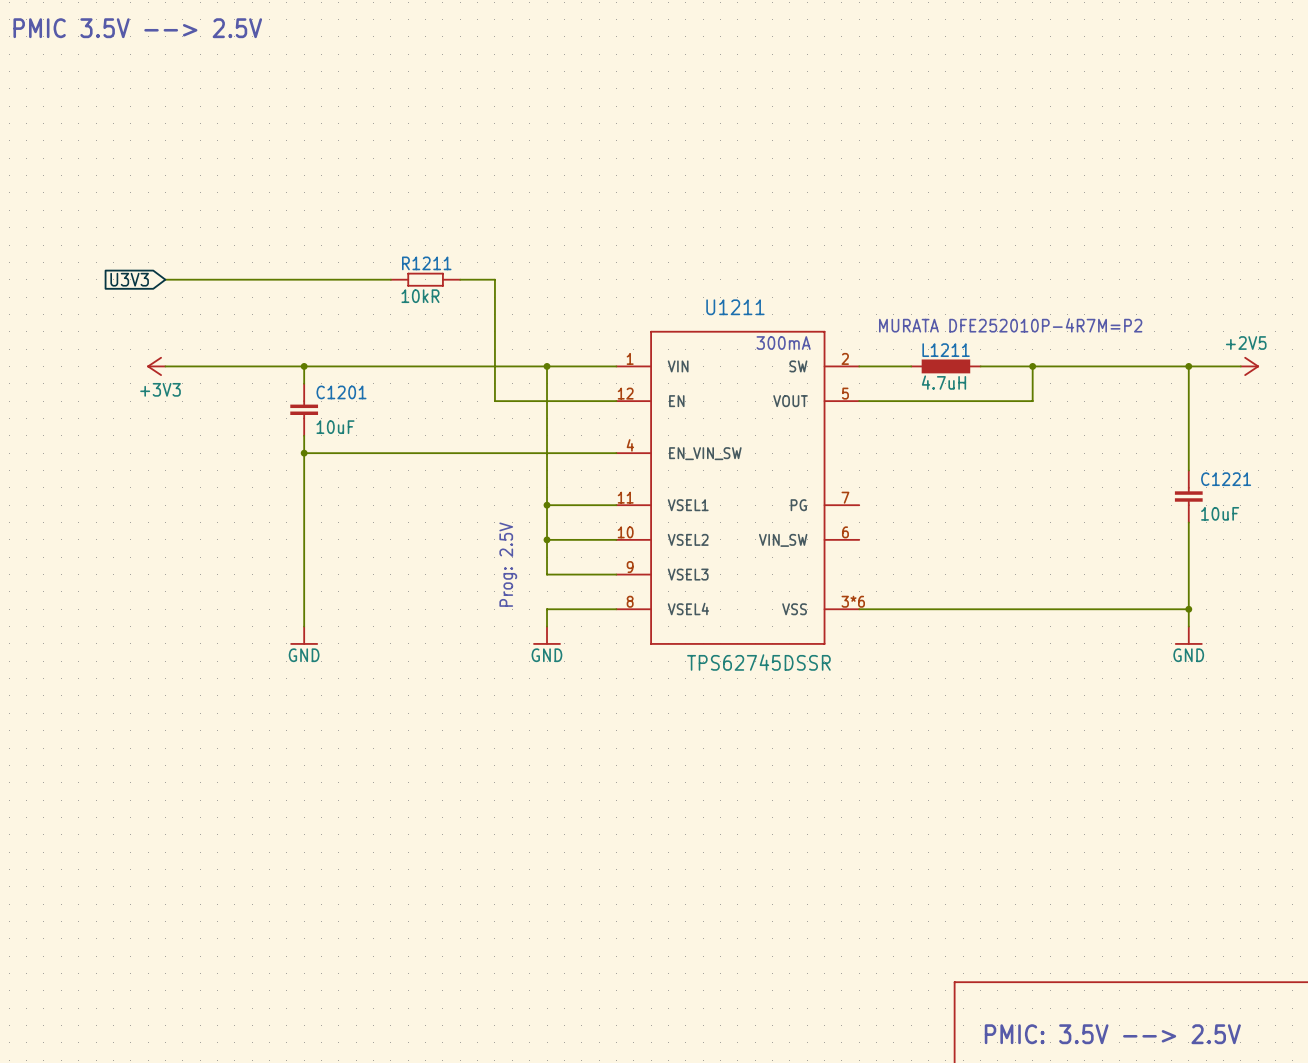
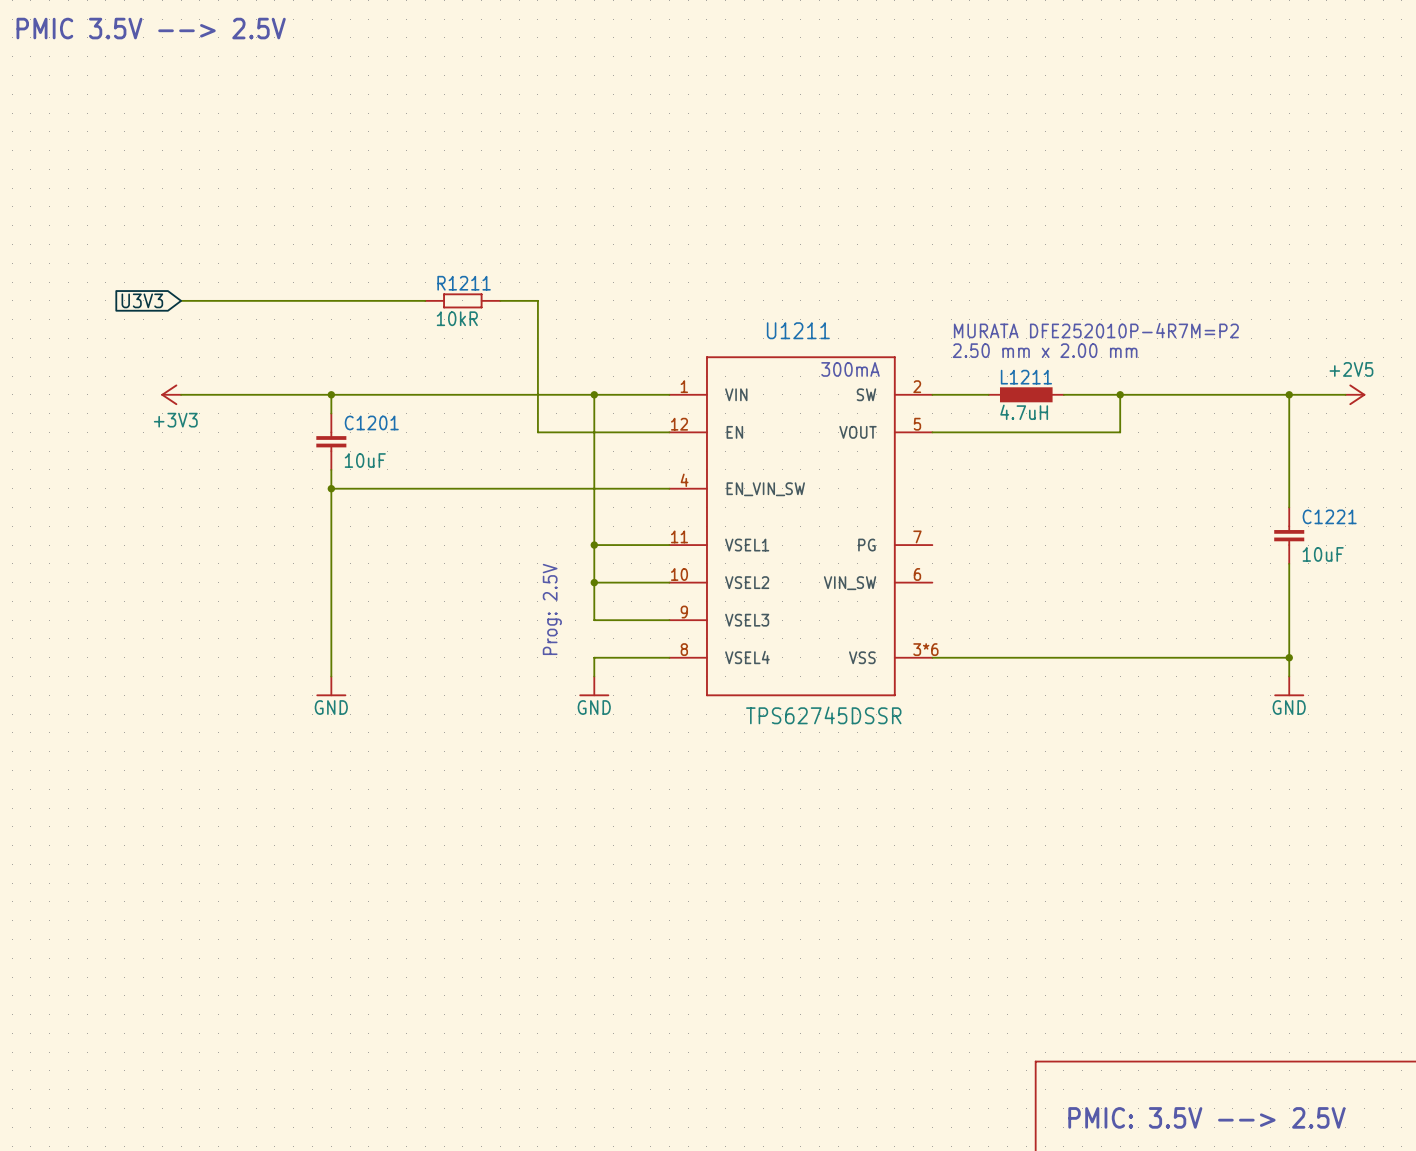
text: none -> MURATA DFE252010P-4R7M=P2 (1096, 330)
text: MURATA DFE252010P-4R7M=P2 (1010, 325) -> 2.50 mm x 2.00 mm (1045, 350)

